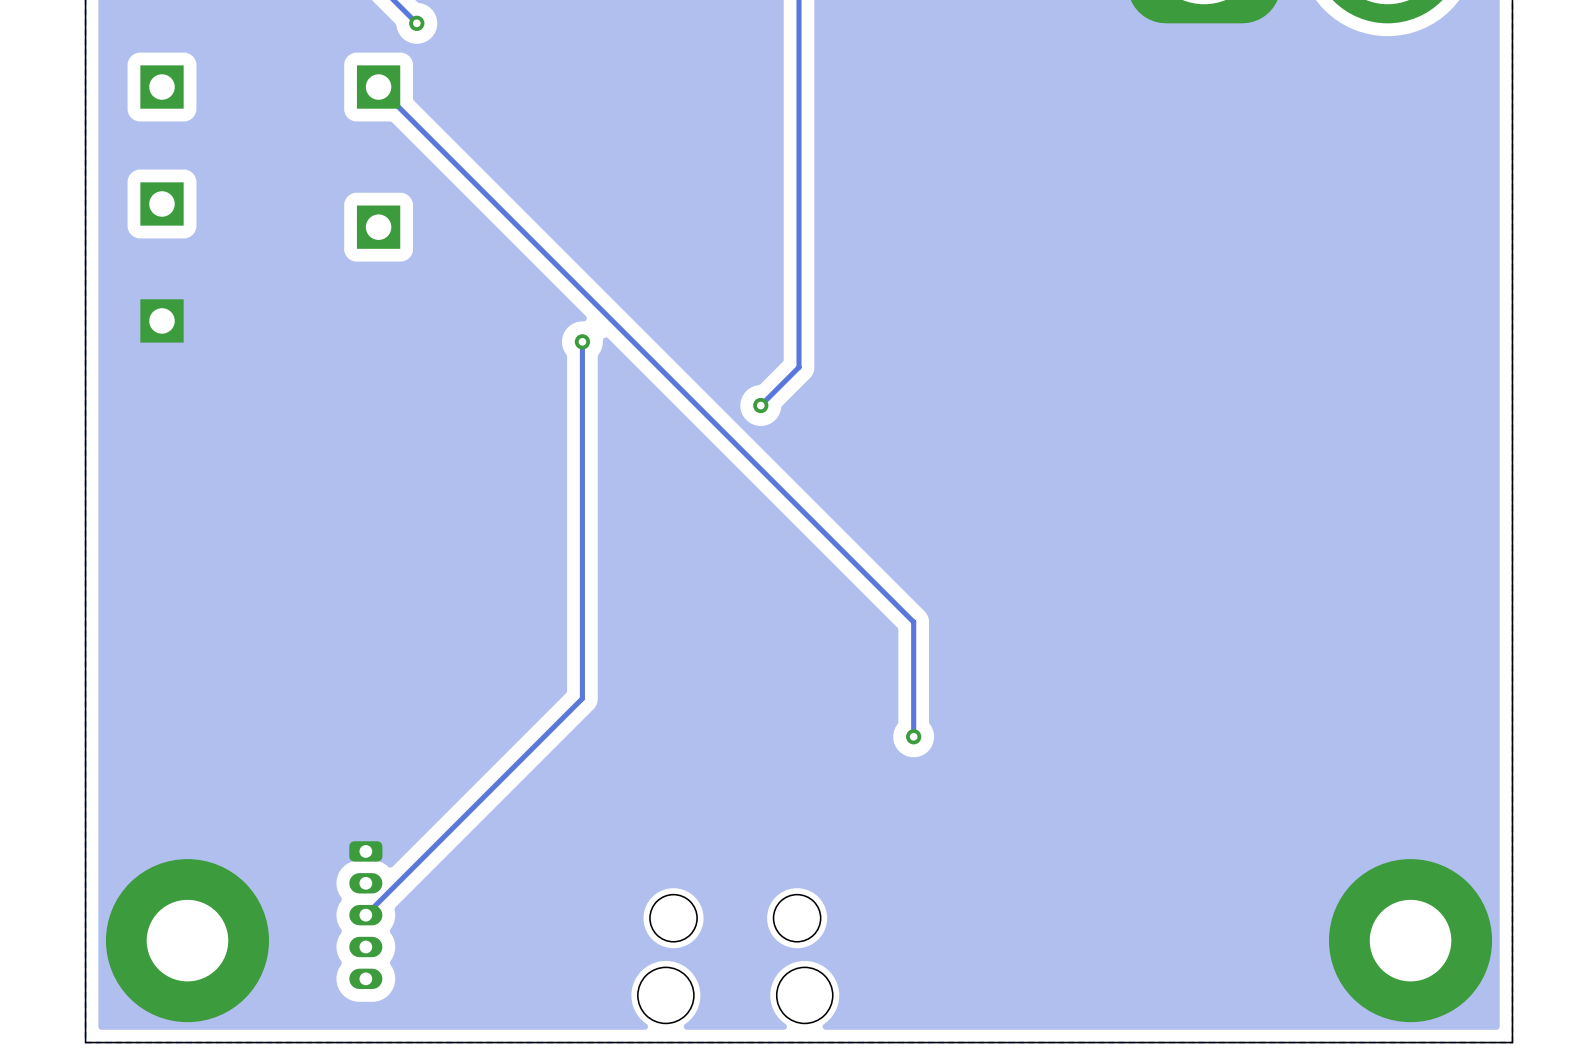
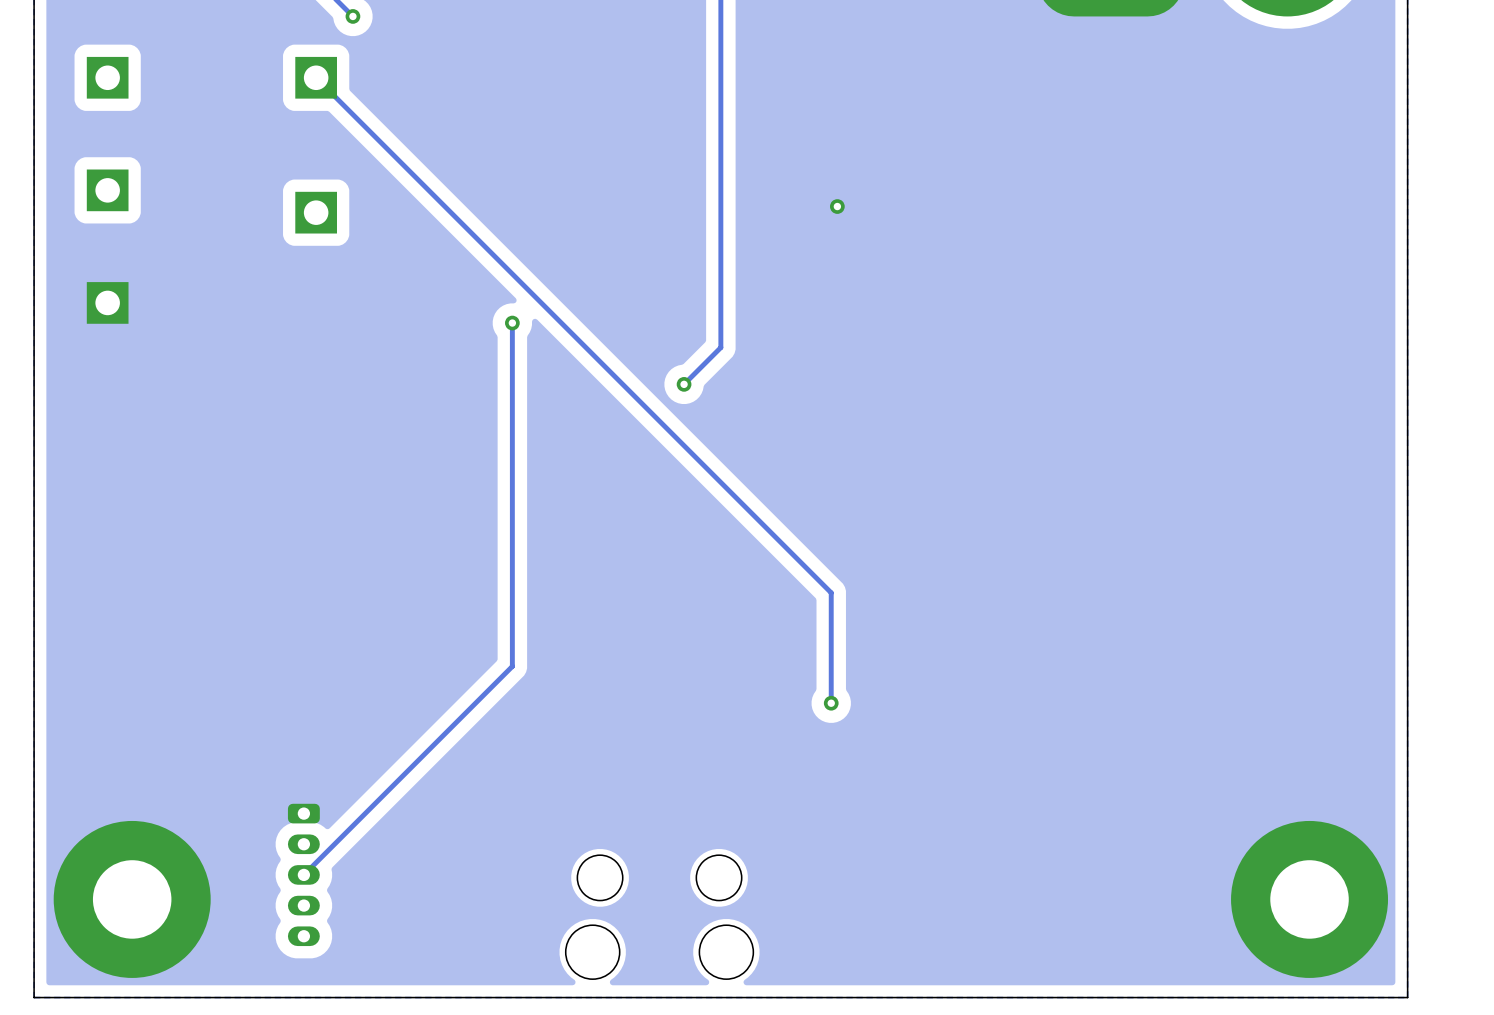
via: none -> (837, 206)

